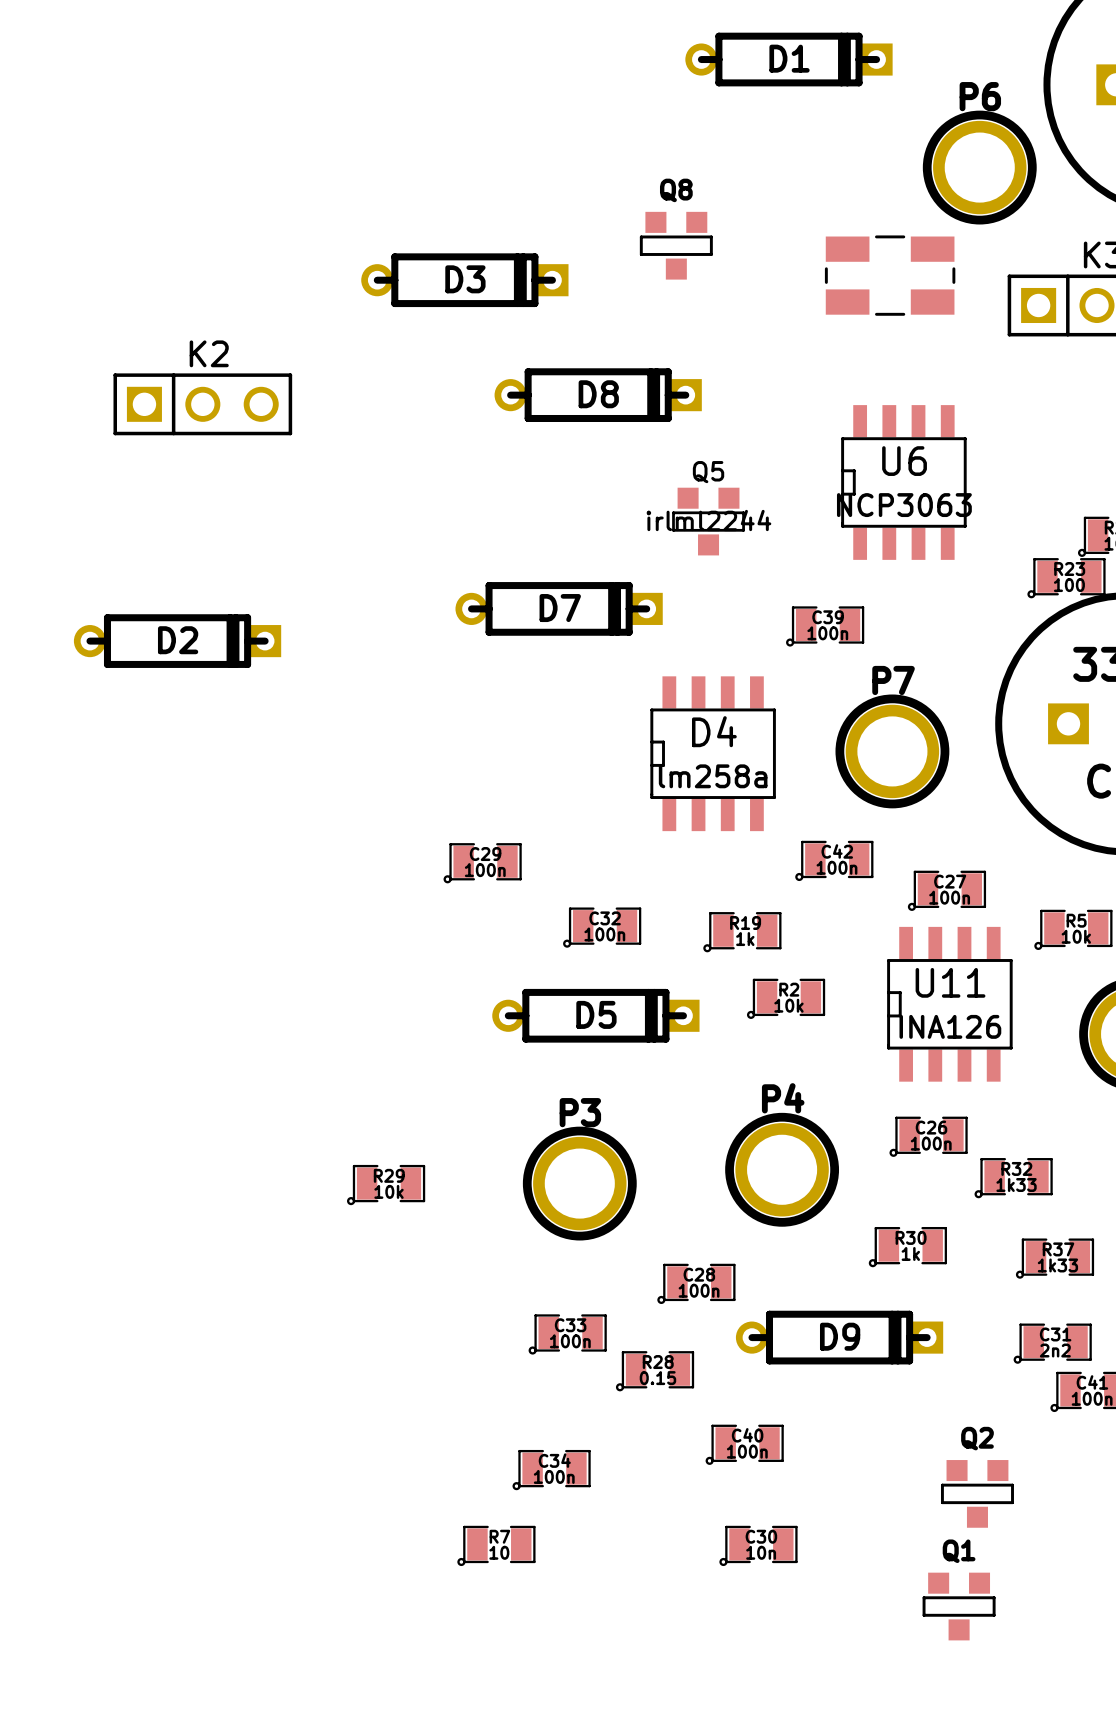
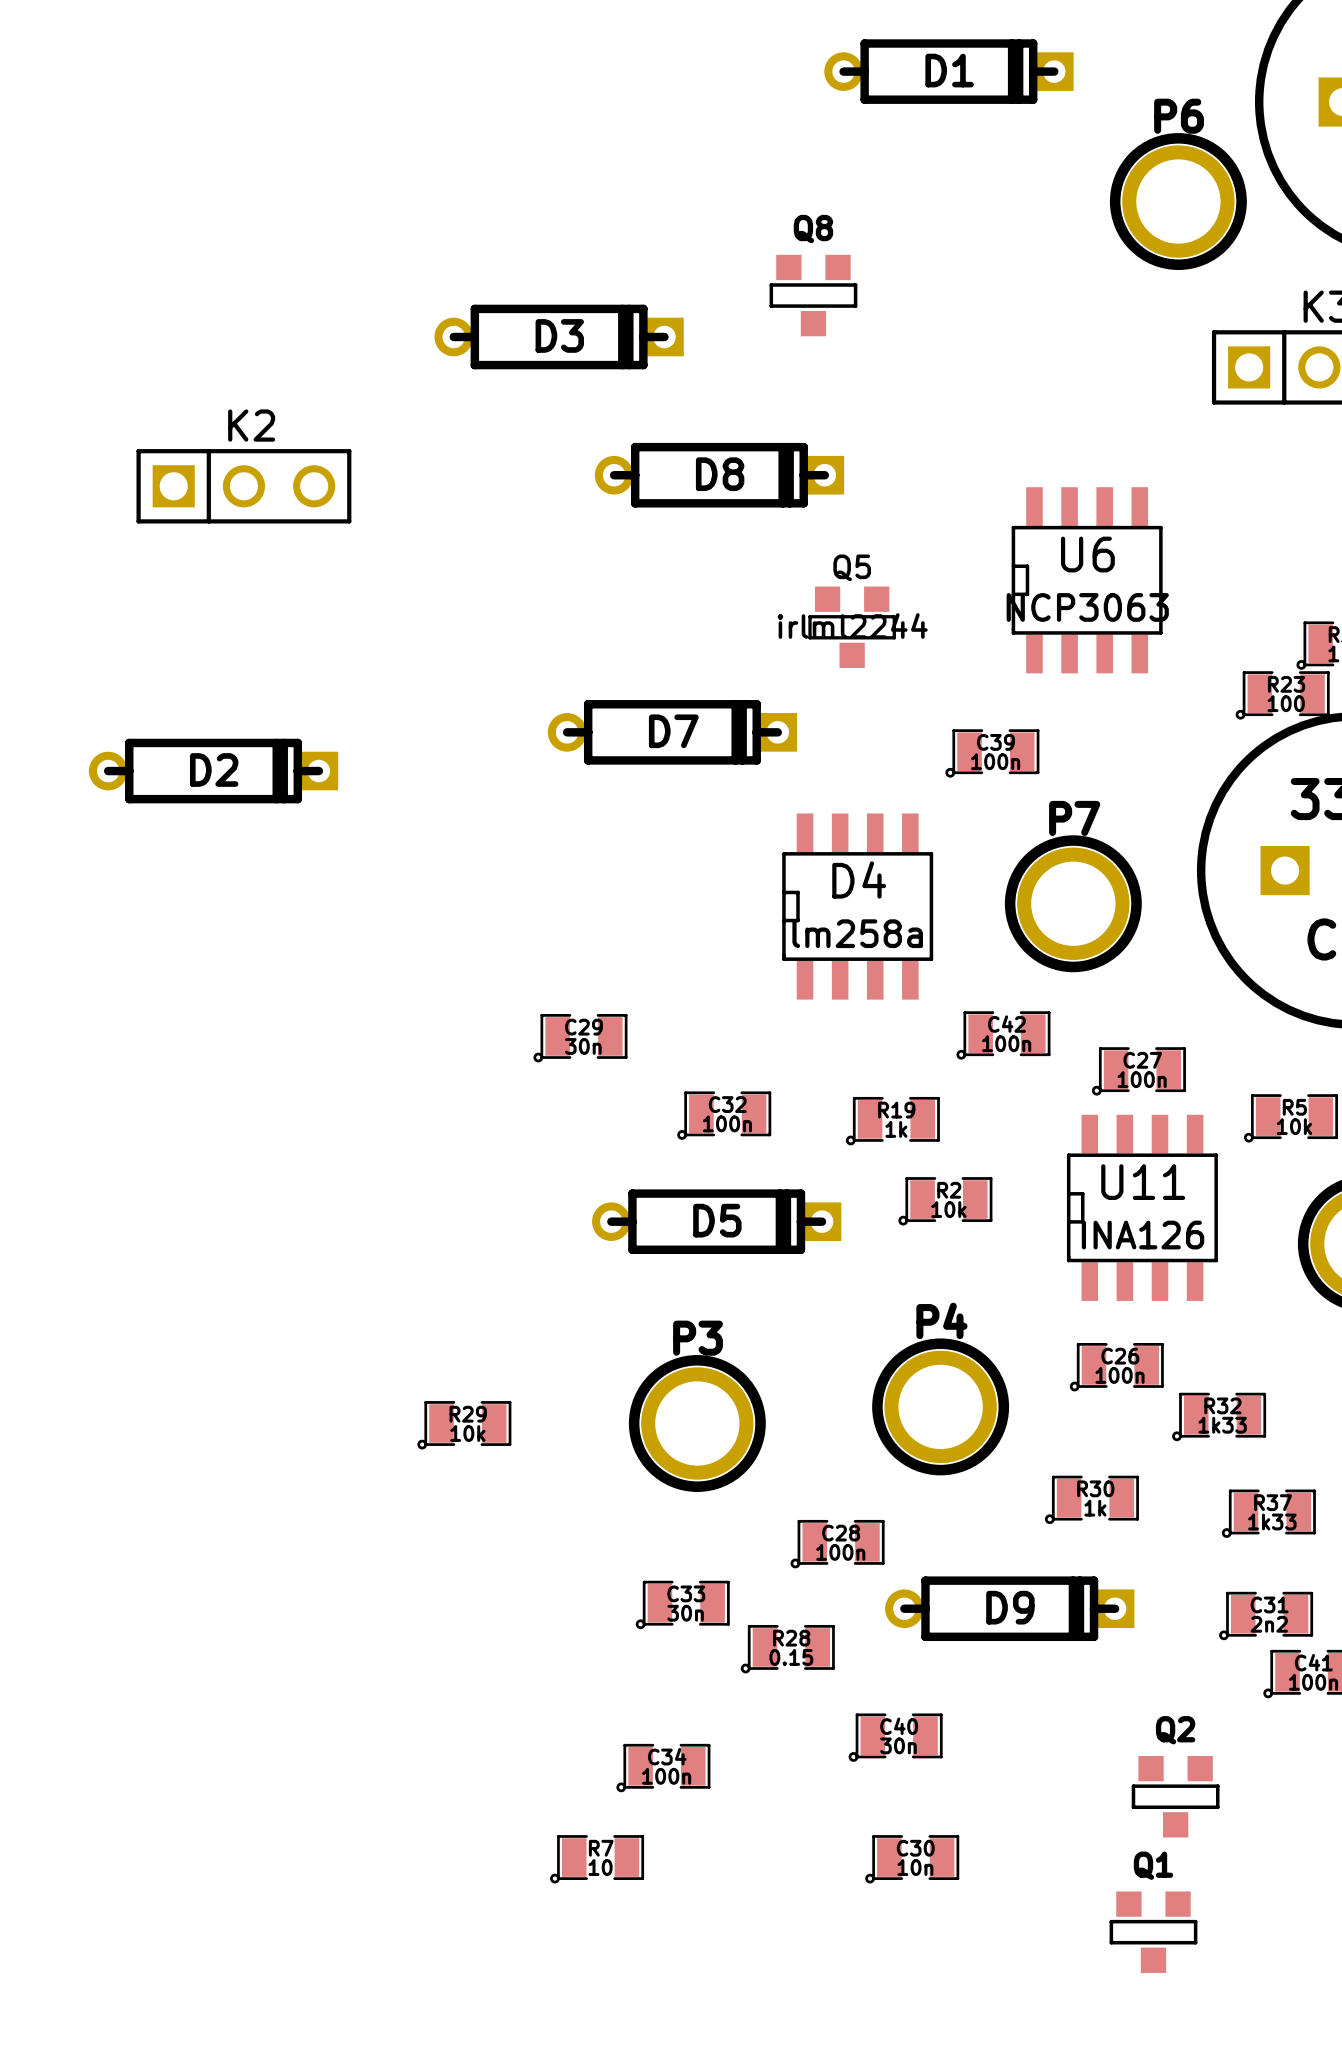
part: (890, 275) -> none
C29 value: 100n (485, 870) -> 30n (583, 1046)
C33 value: 100n (570, 1341) -> 30n (685, 1613)
C40 value: 100n (747, 1451) -> 30n (898, 1745)

